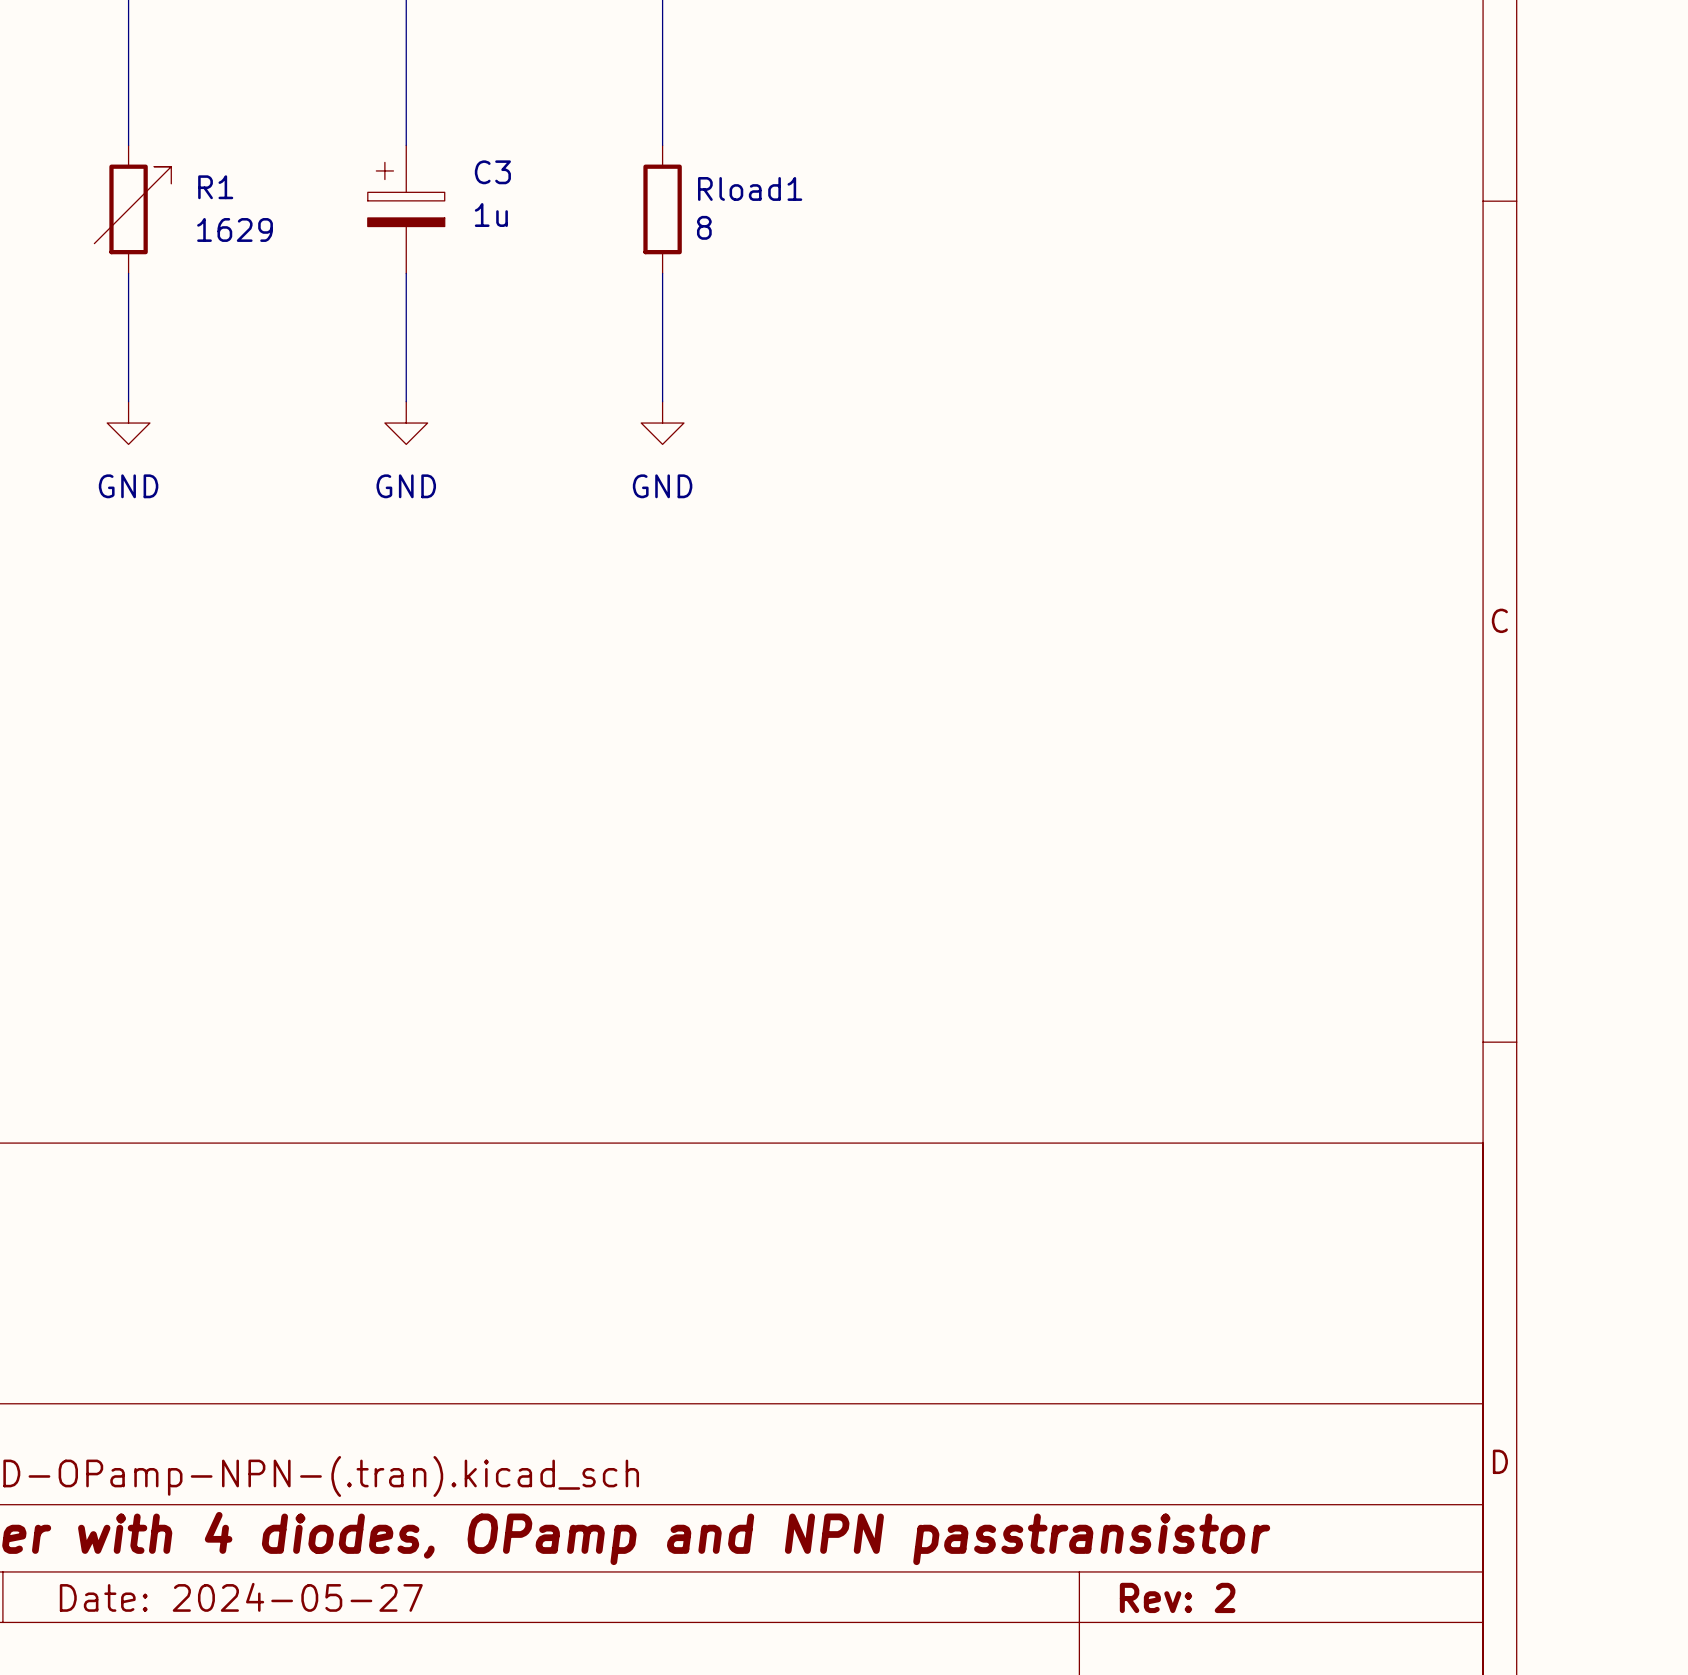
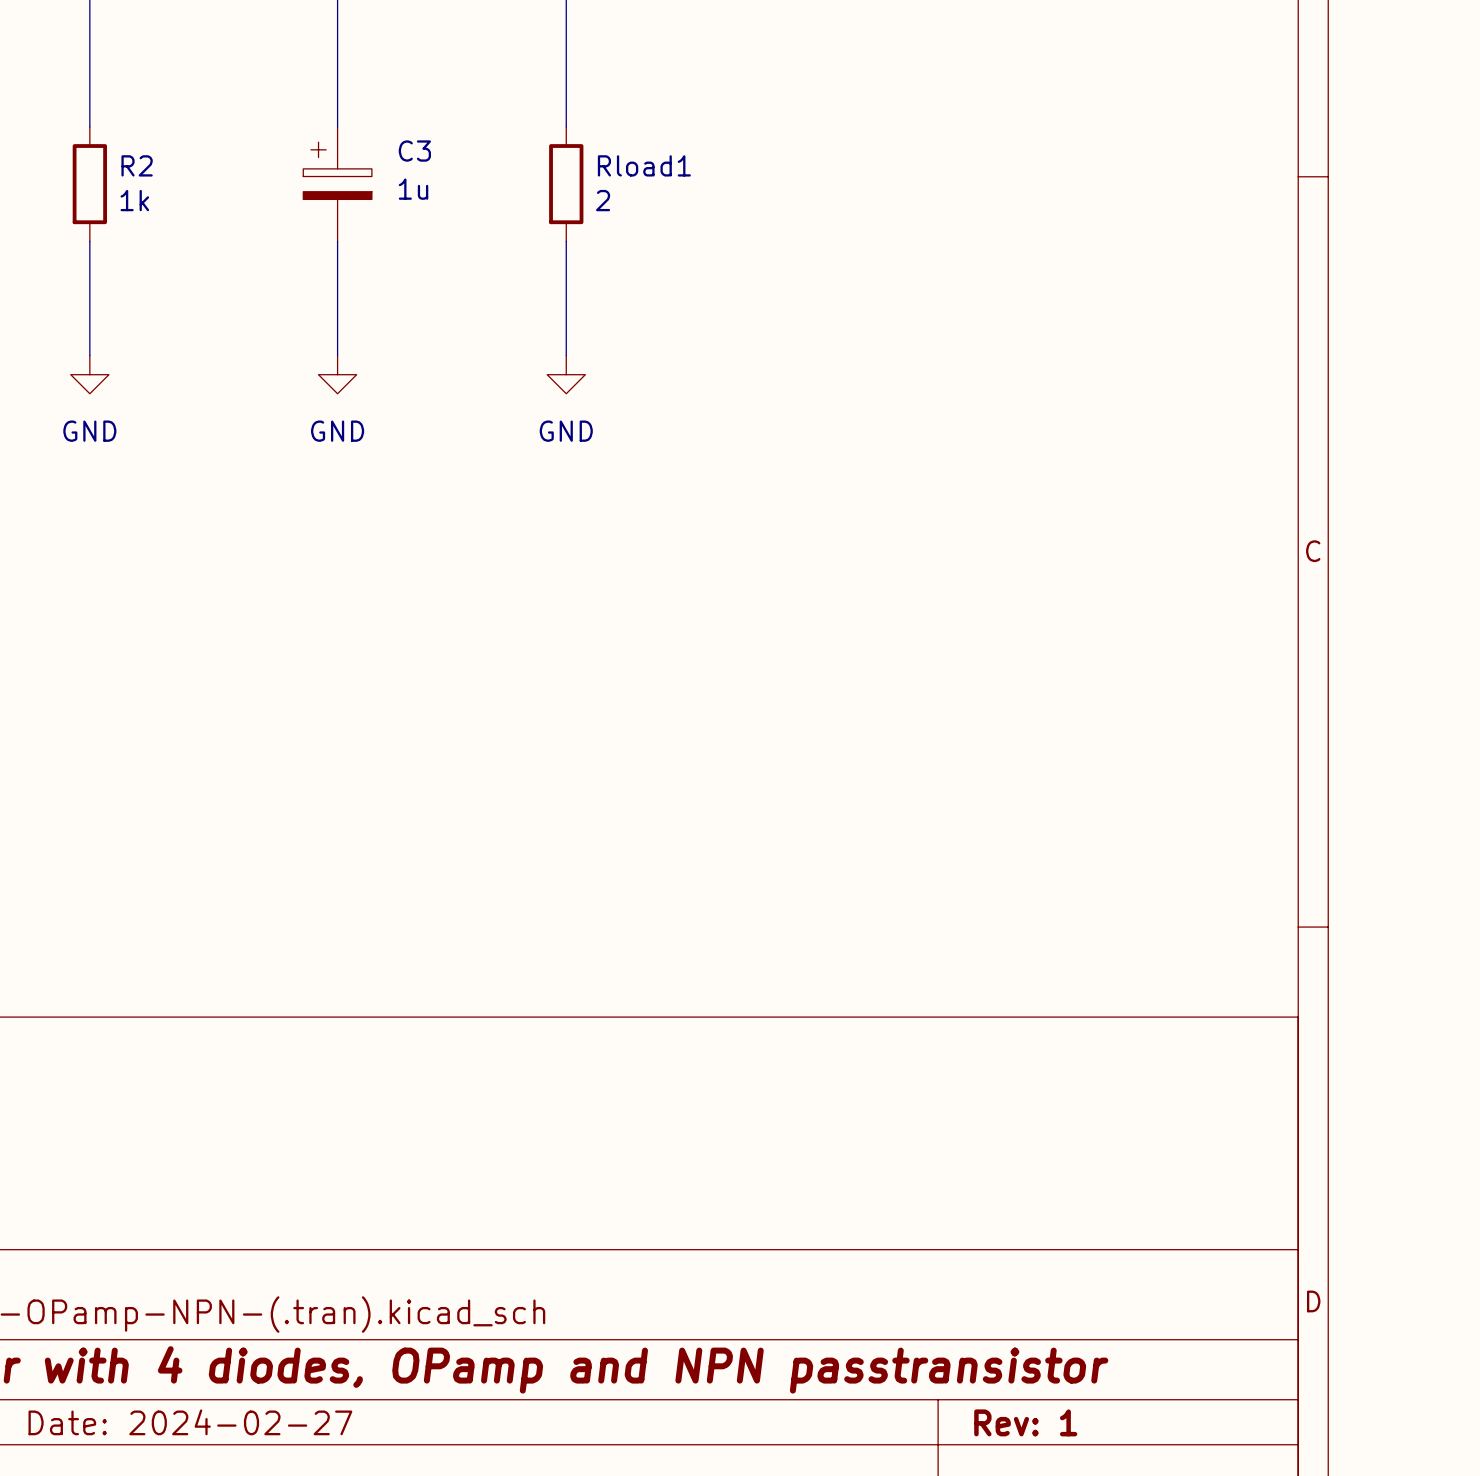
R2: none -> 1k (89, 184)
R1: 1629 (132, 209) -> none
Rload1 value: 8 (704, 227) -> 2 (603, 200)
title block: Date: 2024-05-27 (241, 1597) -> Date: 2024-02-27 (190, 1422)
title block: Rev: 2 (1177, 1597) -> Rev: 1 (1025, 1422)

